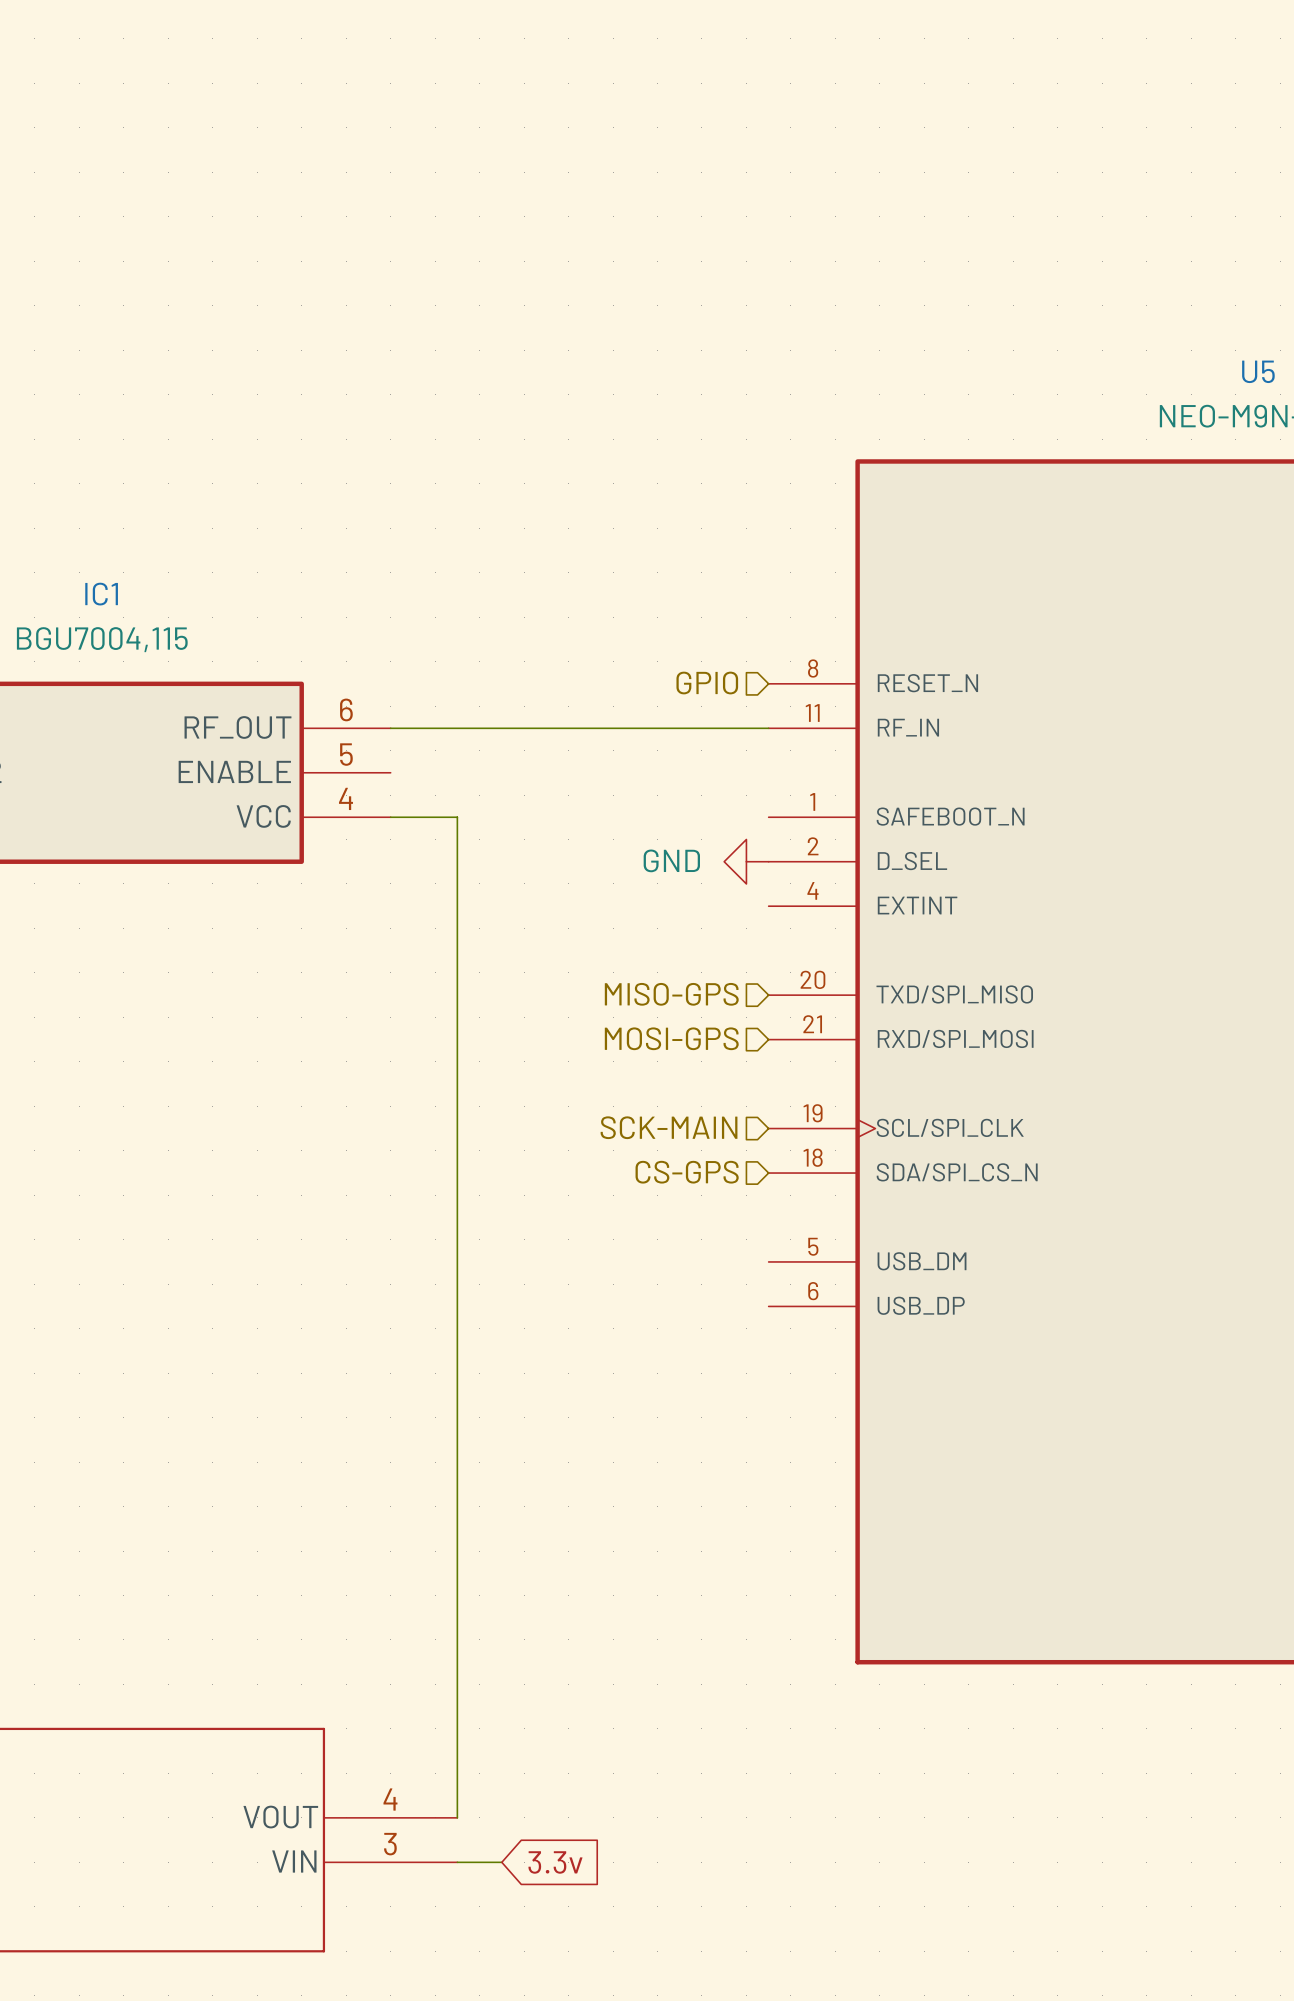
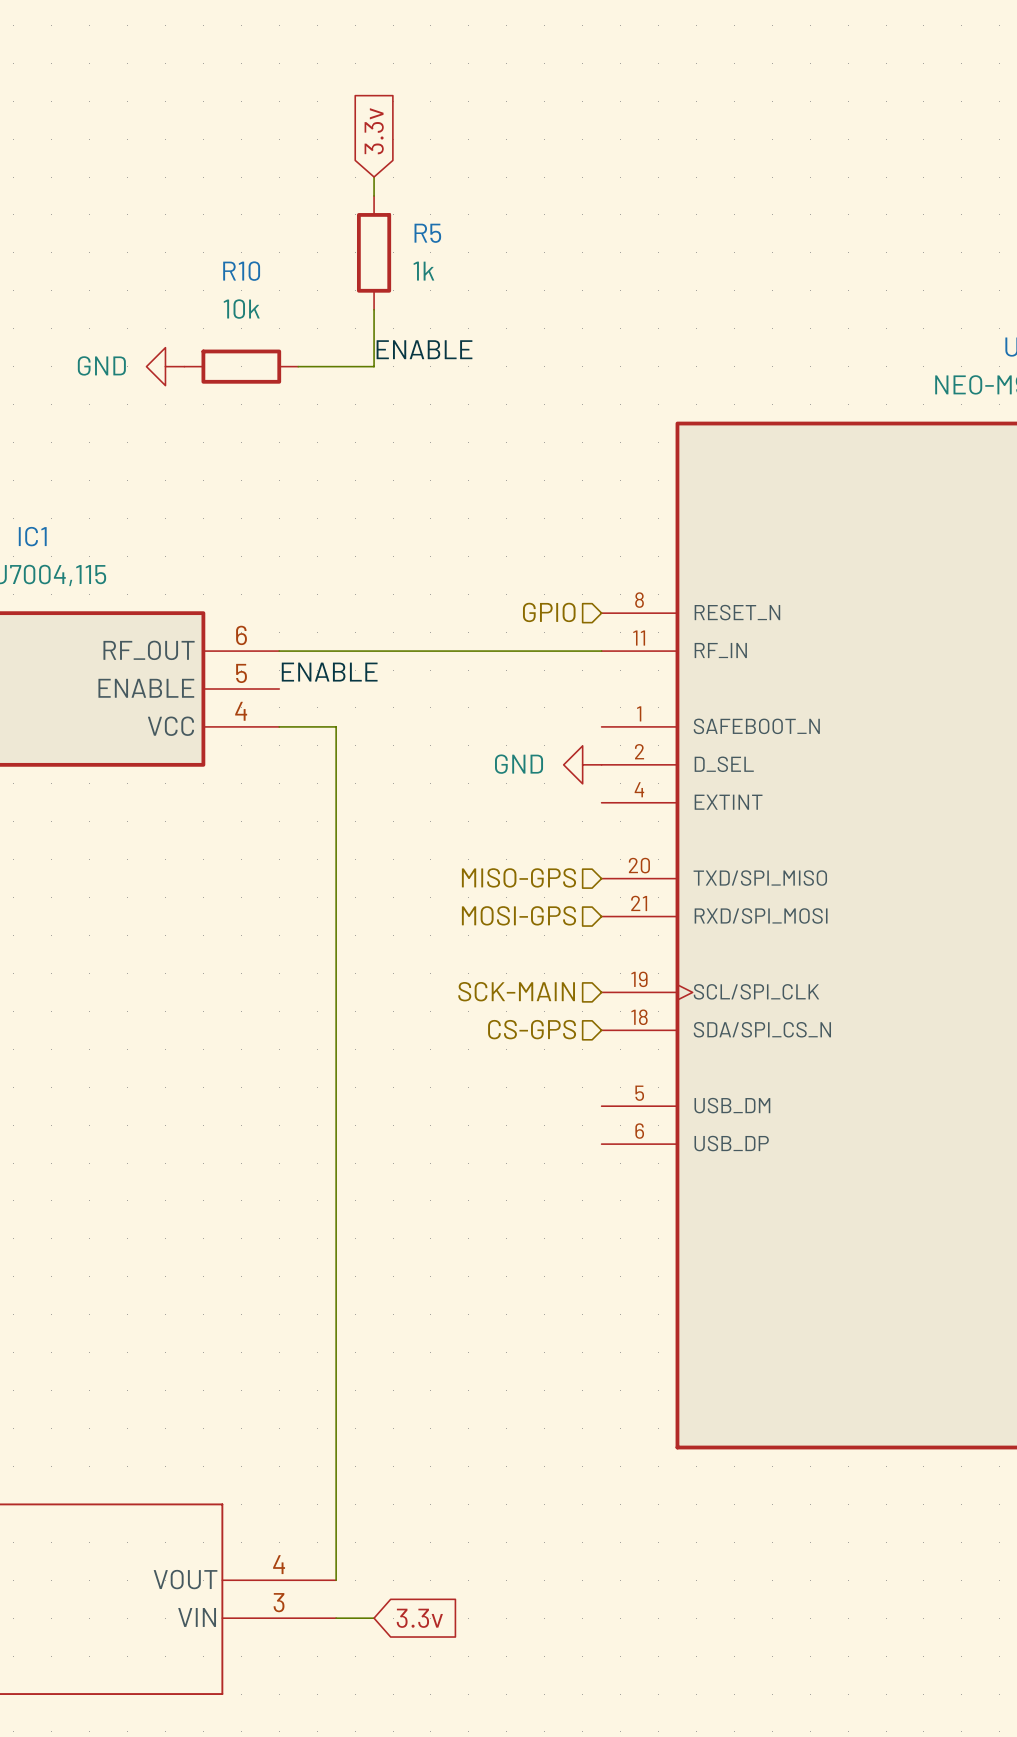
global label: none -> 3.3v (374, 131)
wire: none -> (374, 177) (374, 195)
R5: none -> 1k (374, 252)
wire: none -> (374, 309) (374, 366) (298, 366)
label: none -> ENABLE (424, 349)
power symbol: none -> GND (165, 366)
R10: none -> 10k (241, 366)
label: none -> ENABLE (329, 672)

